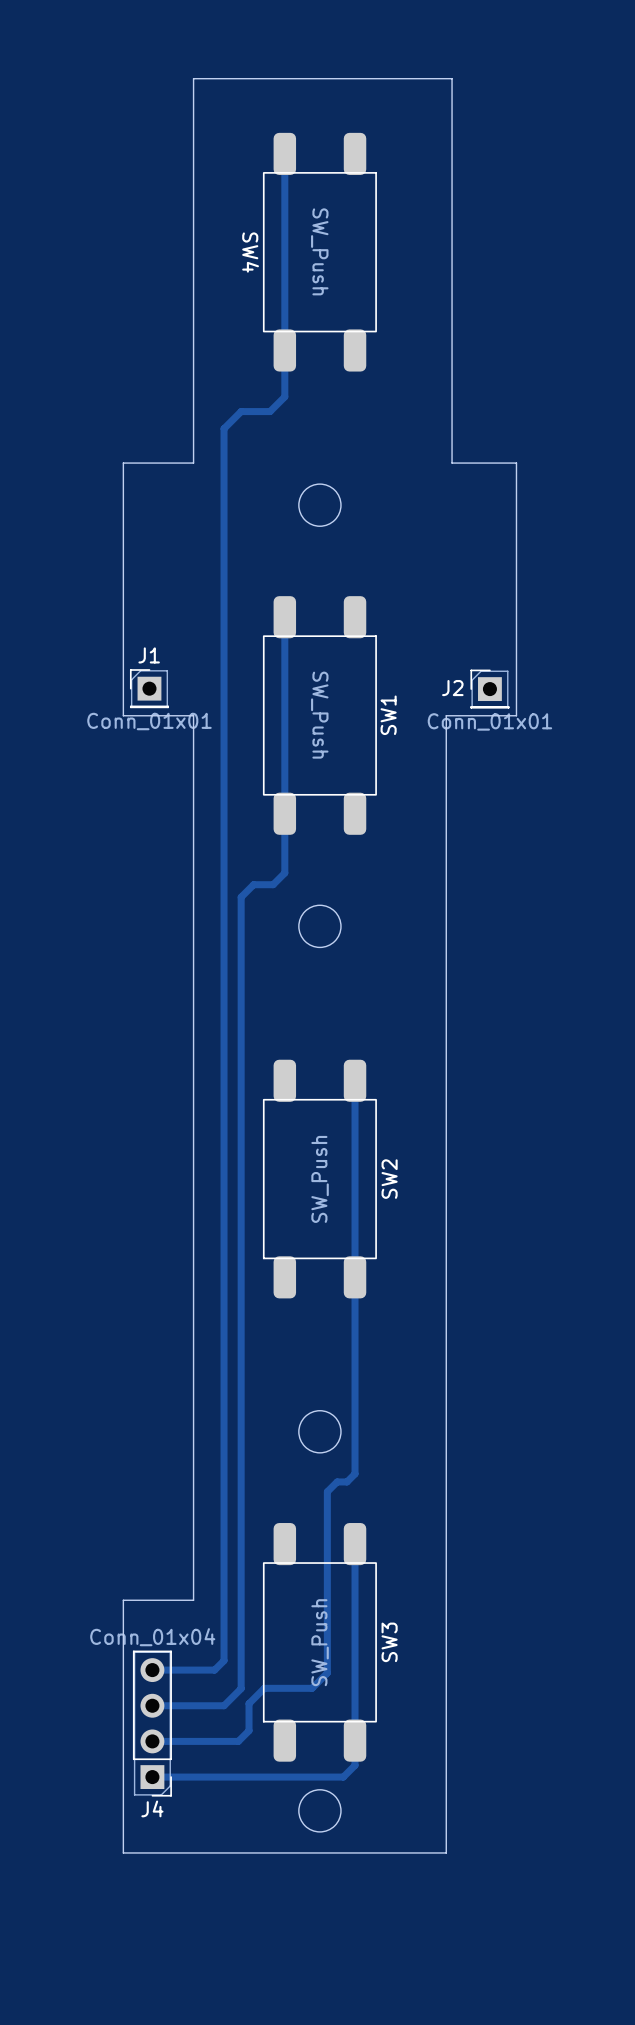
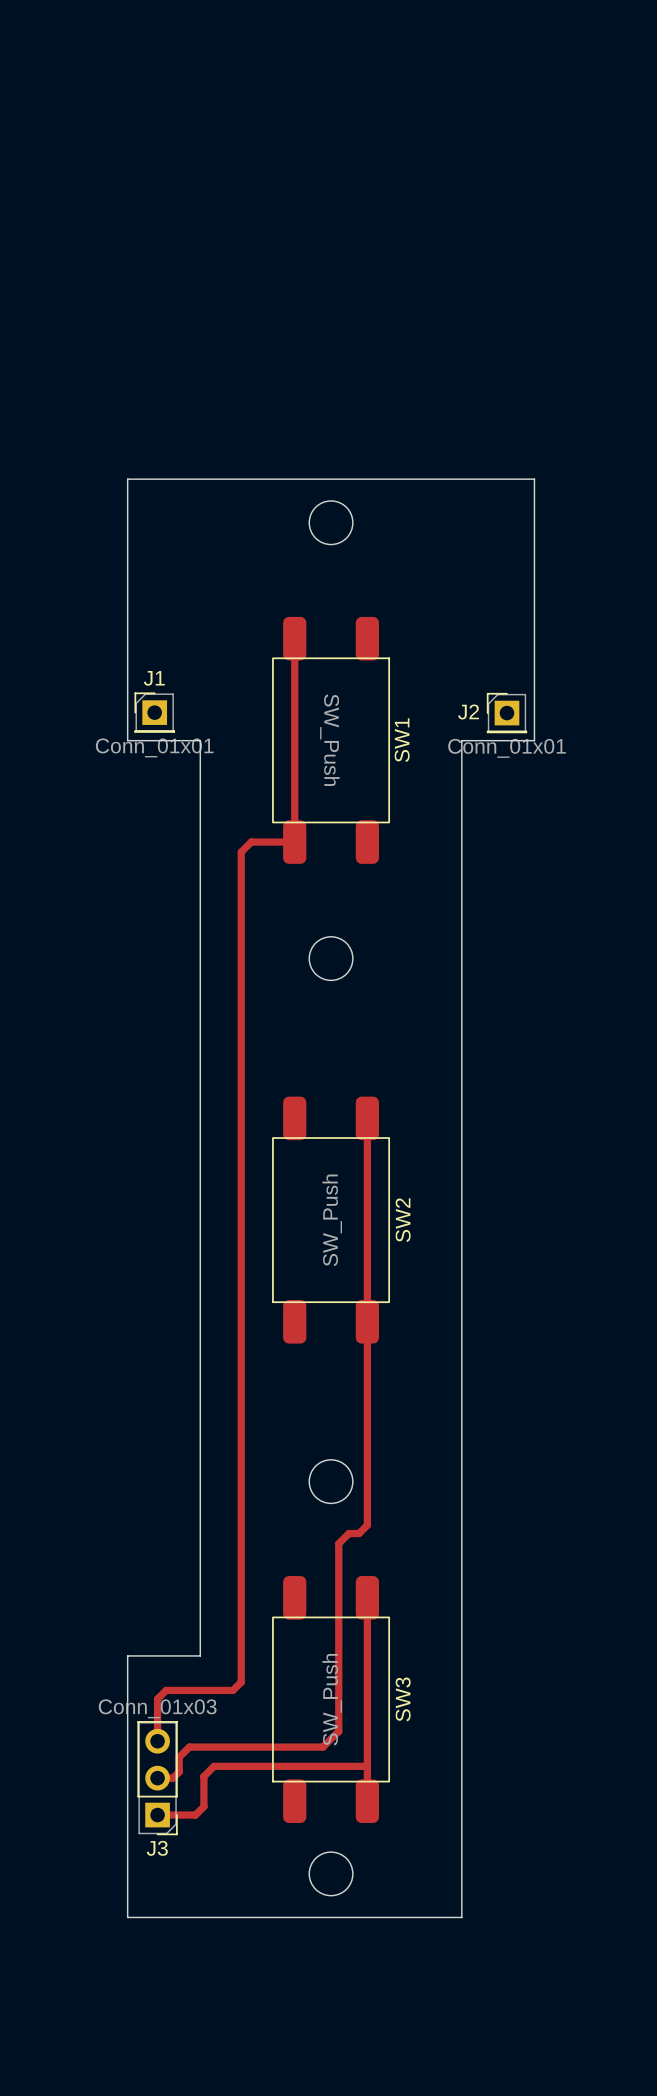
track: (284, 153) (284, 396) (270, 411) (241, 411) (224, 428) (224, 1660) (214, 1670) (152, 1670) -> none
SW4: SW_Push (319, 252) -> none
board edge: (193, 463) (193, 78) (452, 78) (452, 463) -> (200, 479) (467, 479)
track: (284, 813) (284, 873) (273, 884) (253, 884) (241, 897) (241, 1688) (224, 1705) (152, 1705) -> (294, 842) (251, 842) (241, 852) (241, 1682) (232, 1690) (166, 1690) (157, 1699) (157, 1741)
track: (264, 1688) (249, 1703) (249, 1730) (238, 1741) (152, 1741) -> (273, 1747) (189, 1747) (179, 1757) (179, 1771) (172, 1778) (157, 1778)
track: none -> (367, 1766) (214, 1766) (203, 1776) (203, 1806) (195, 1815) (157, 1815)
J3: none -> Conn_01x03 (157, 1778)
J4: Conn_01x04 (152, 1723) -> none
track: (355, 1740) (355, 1765) (343, 1777) (152, 1777) -> none

